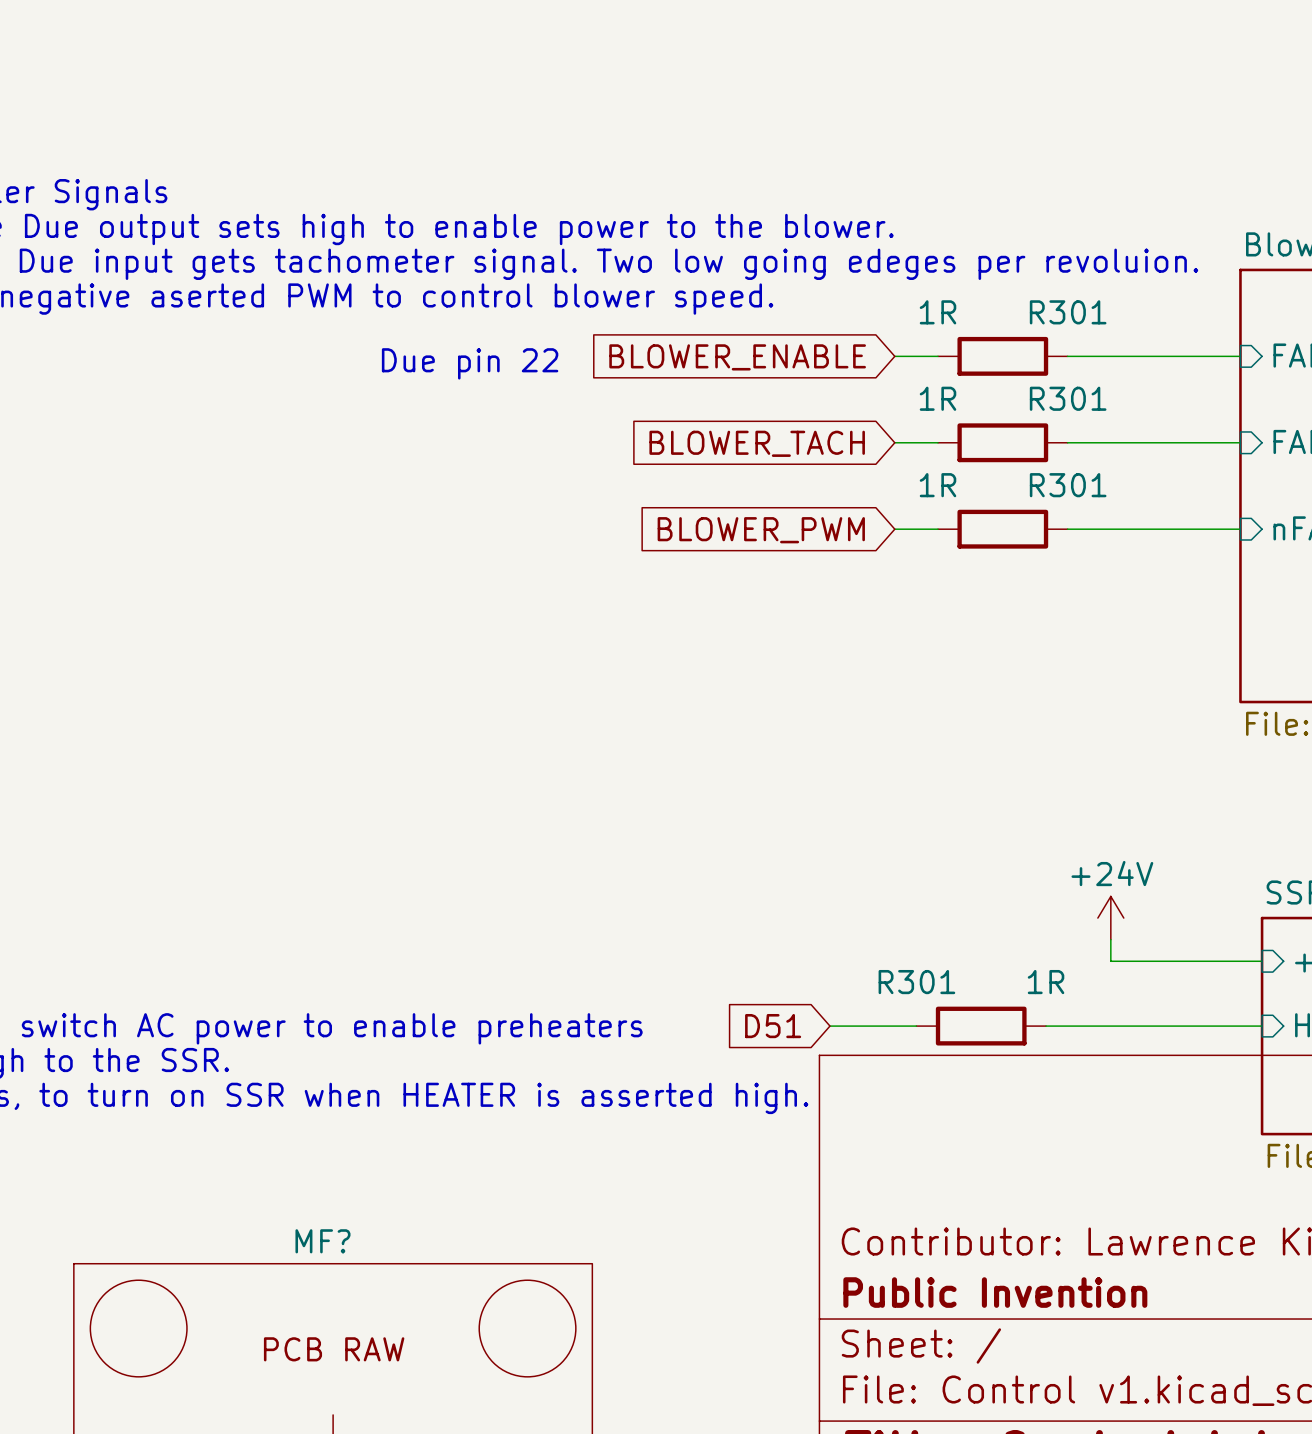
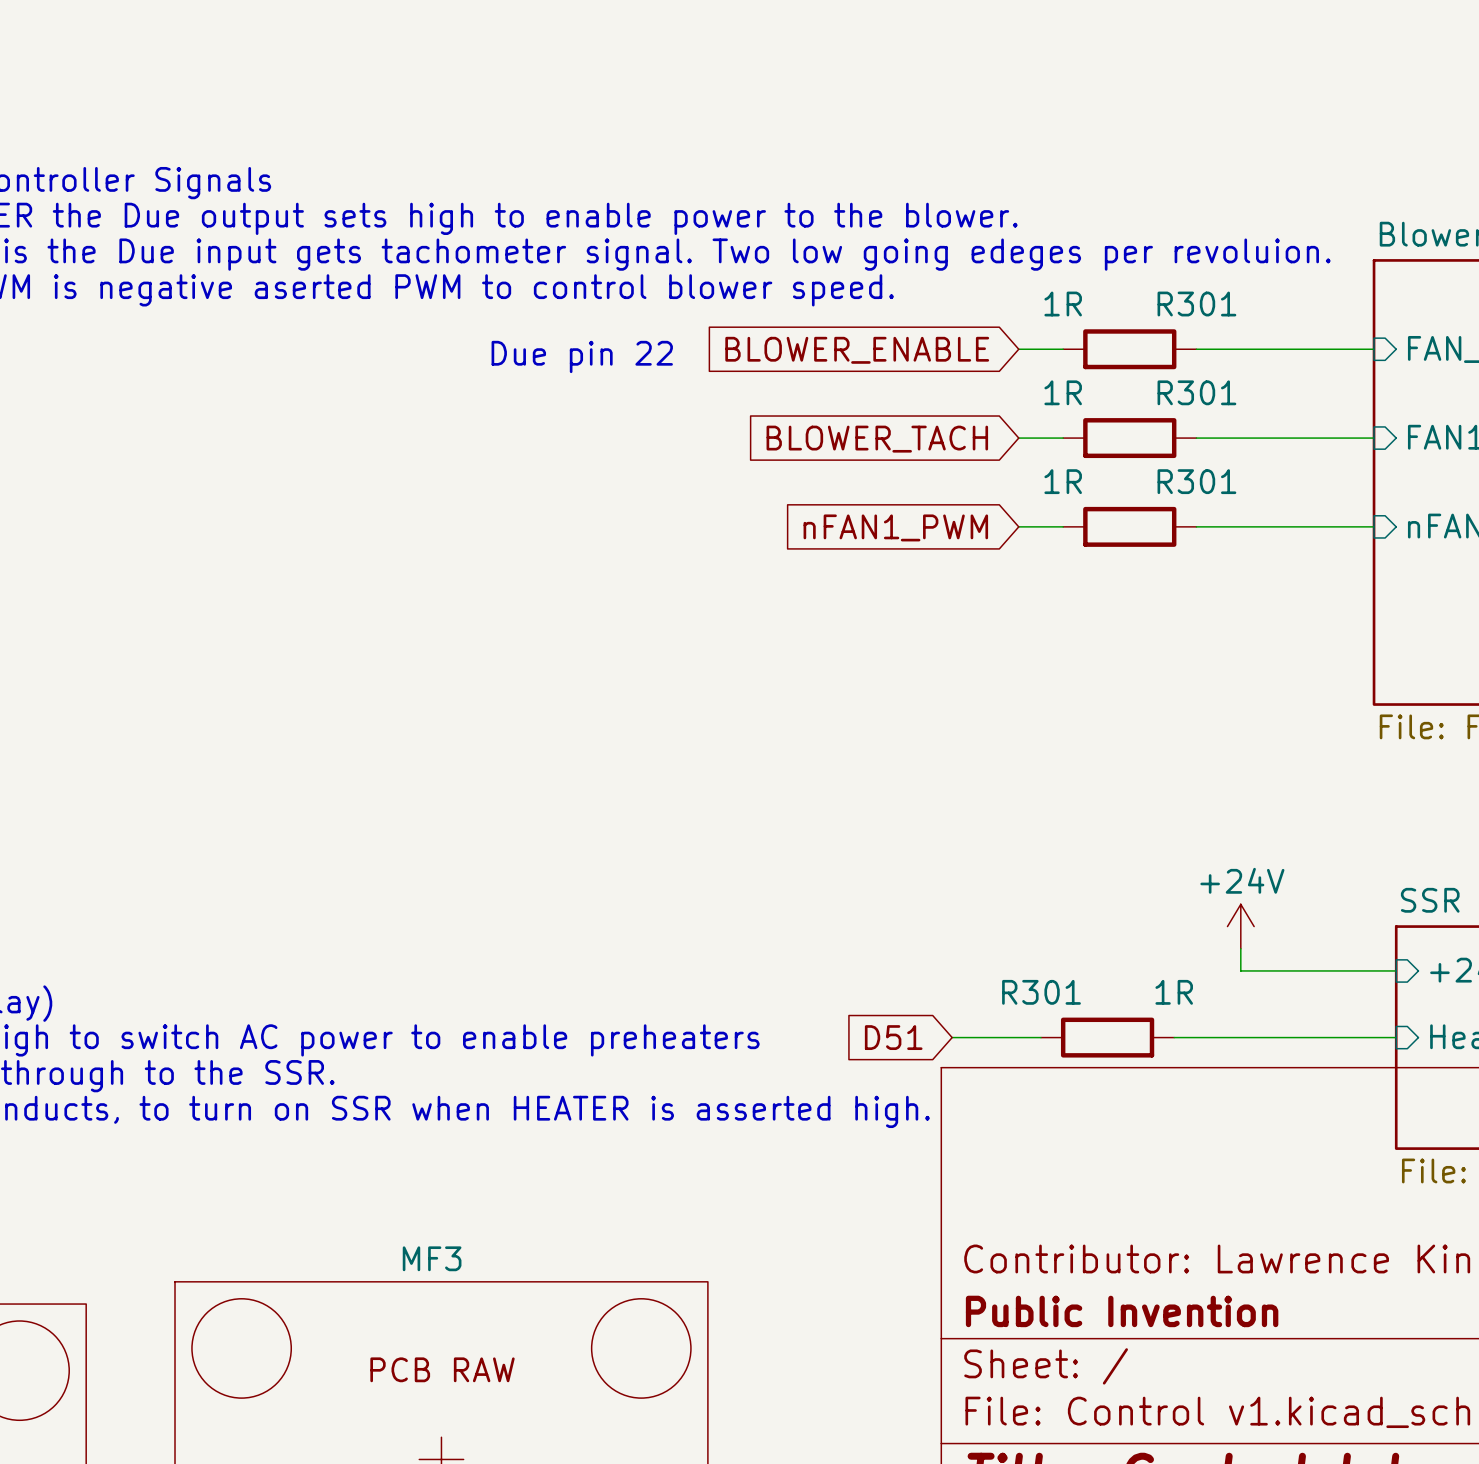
global label: BLOWER_PWM (761, 530) -> nFAN1_PWM (895, 527)
MF? name: MF? (322, 1241) -> MF3 (432, 1258)

